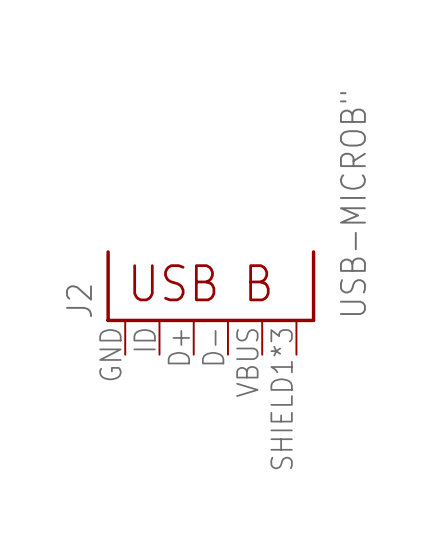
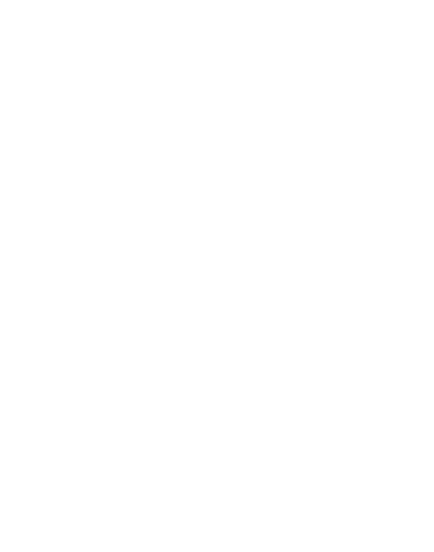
J2: USB-MICROB" (210, 302) -> none

